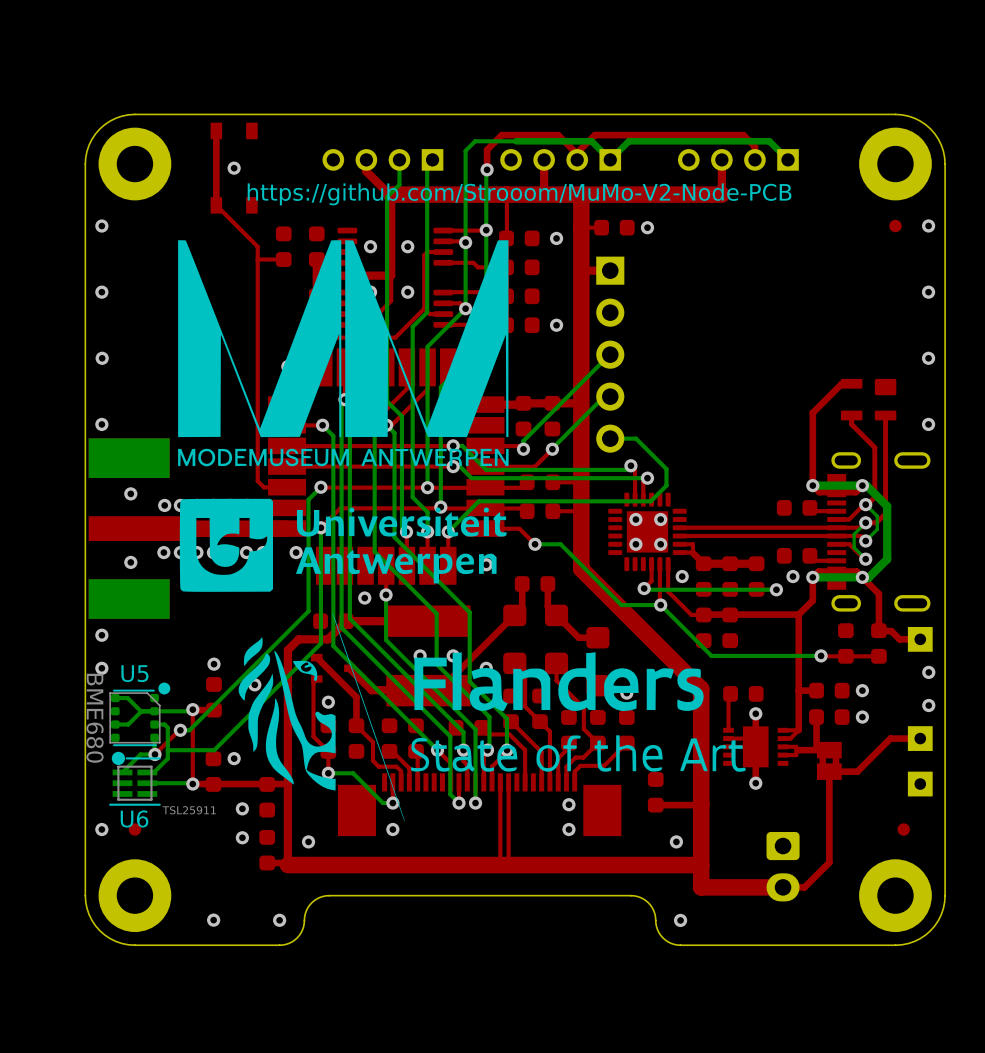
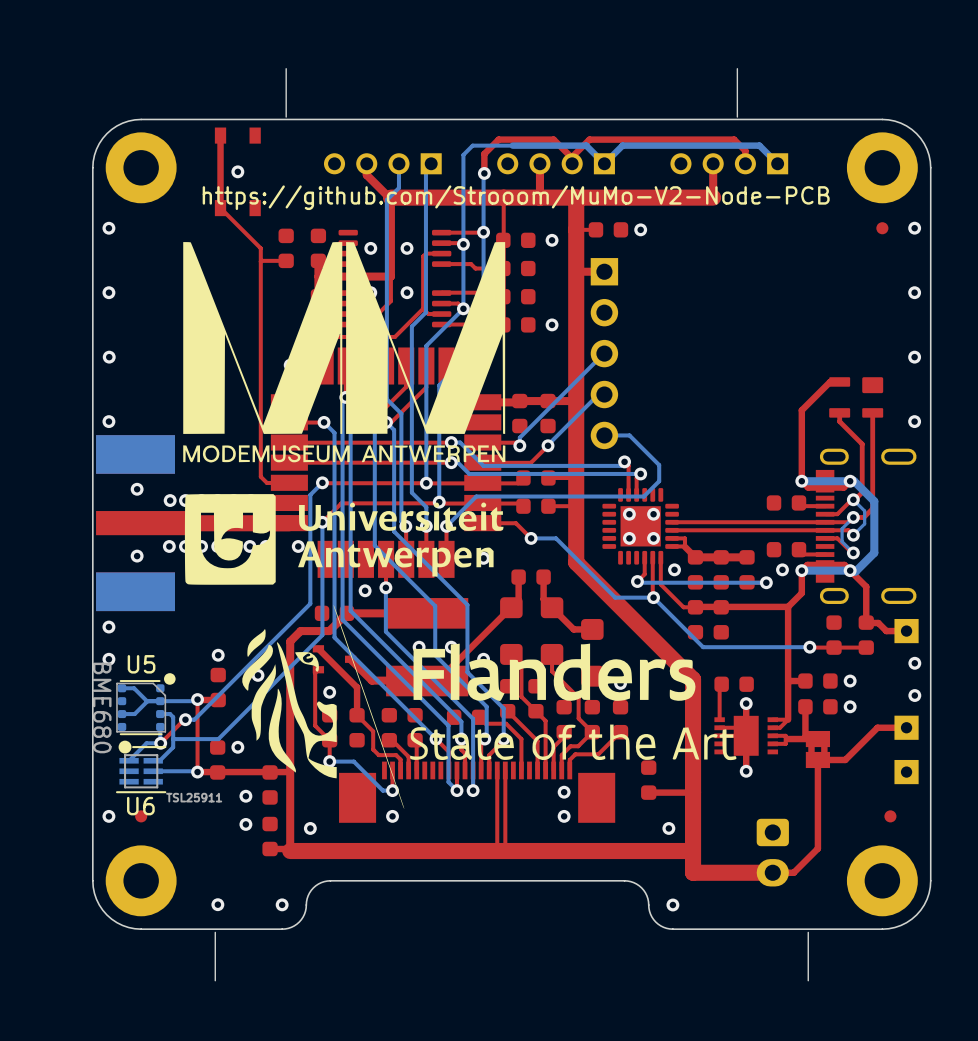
board edge: none -> (286, 68) (286, 117)
board edge: none -> (737, 68) (737, 117)
board edge: none -> (215, 932) (215, 980)
board edge: none -> (808, 932) (808, 980)

